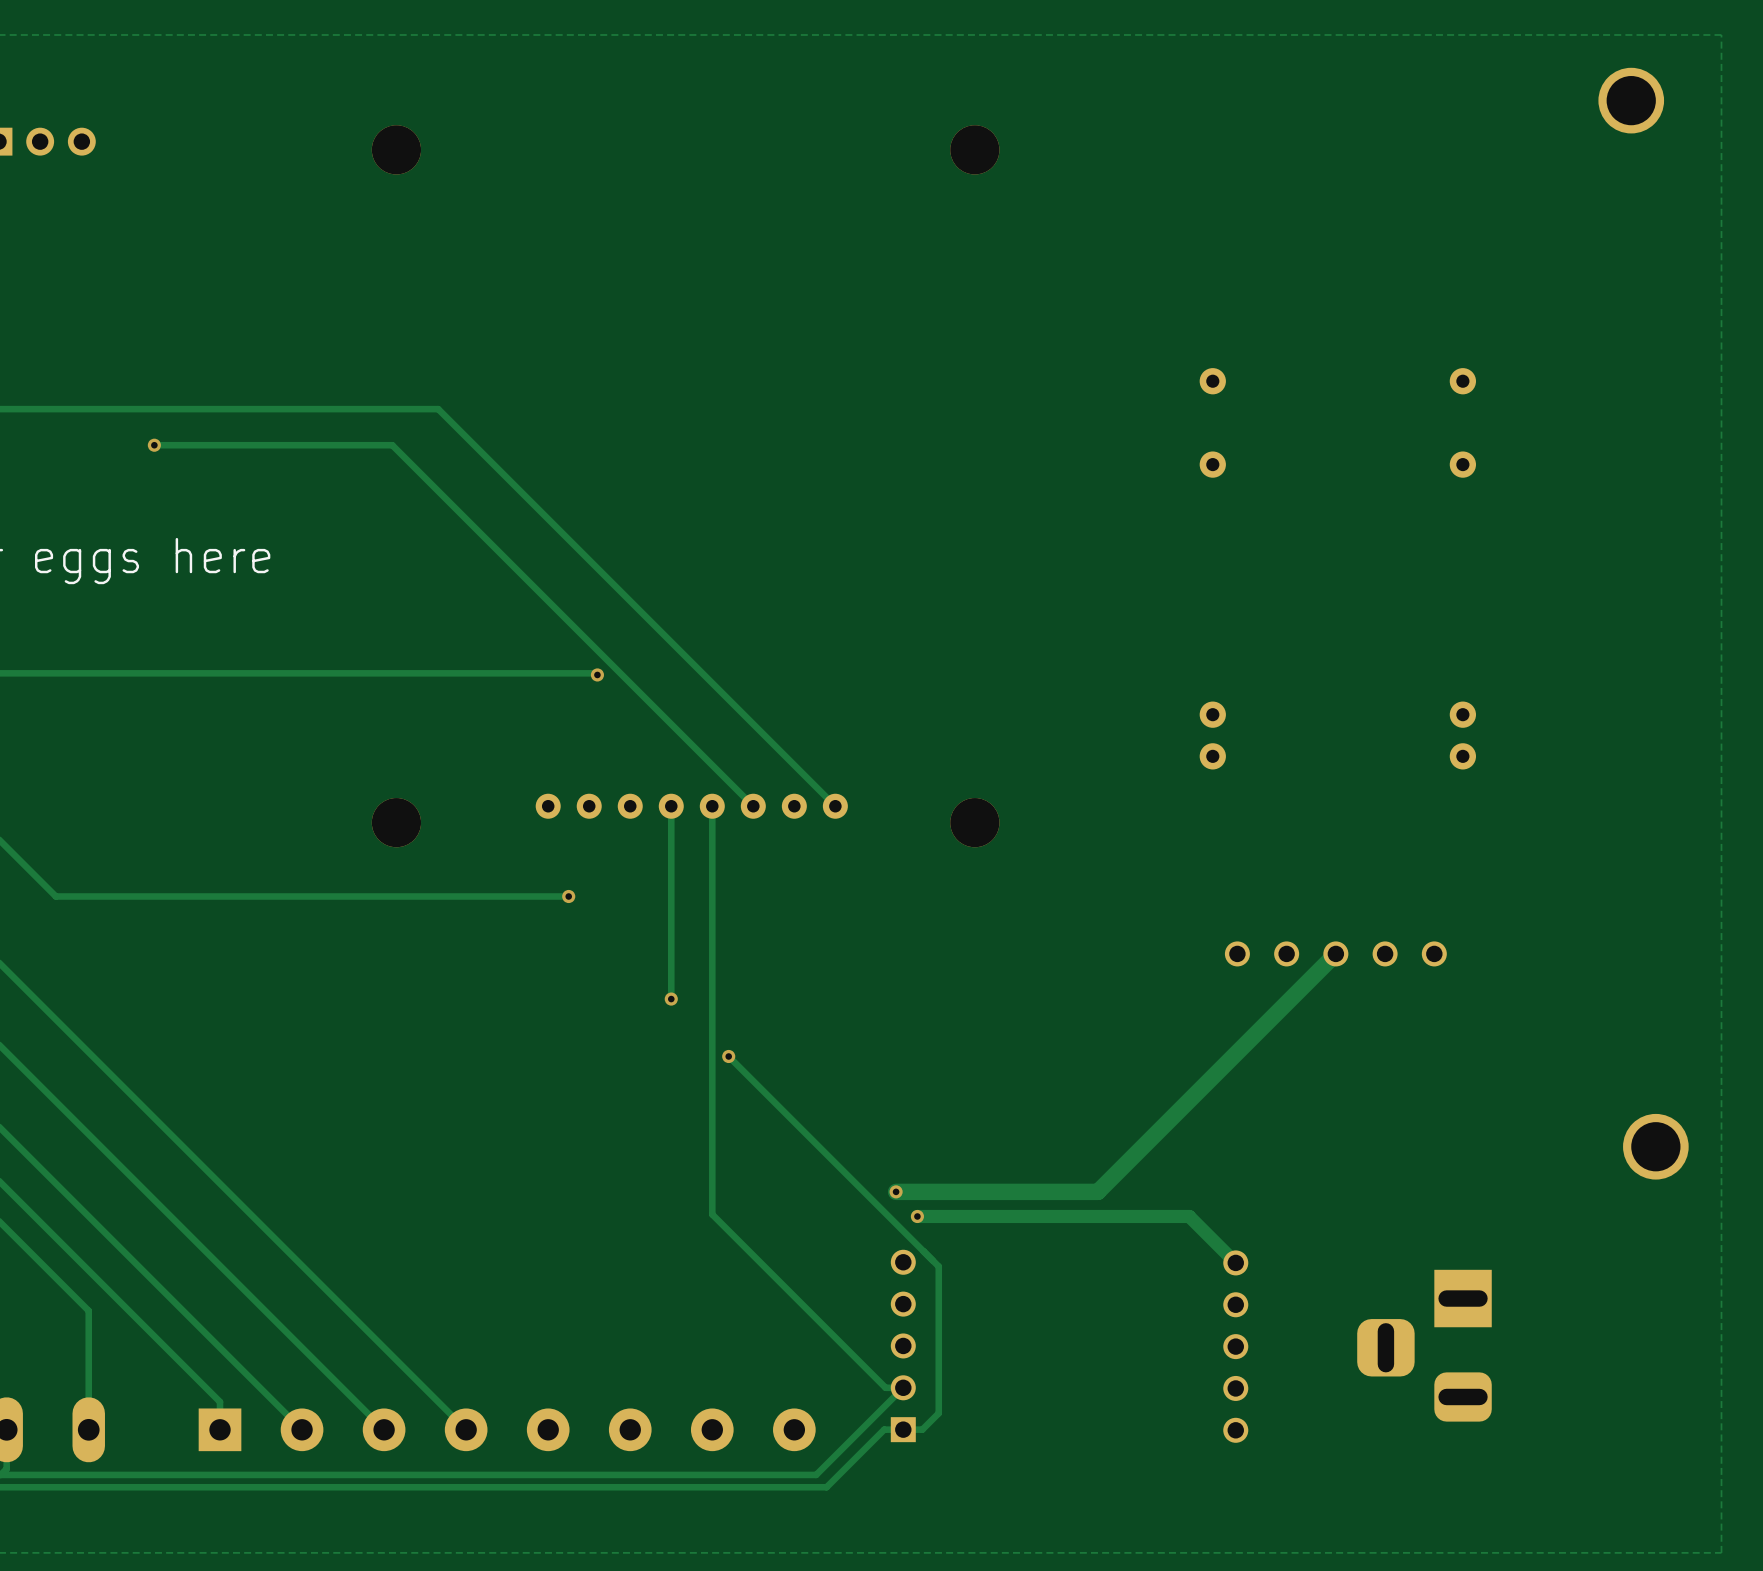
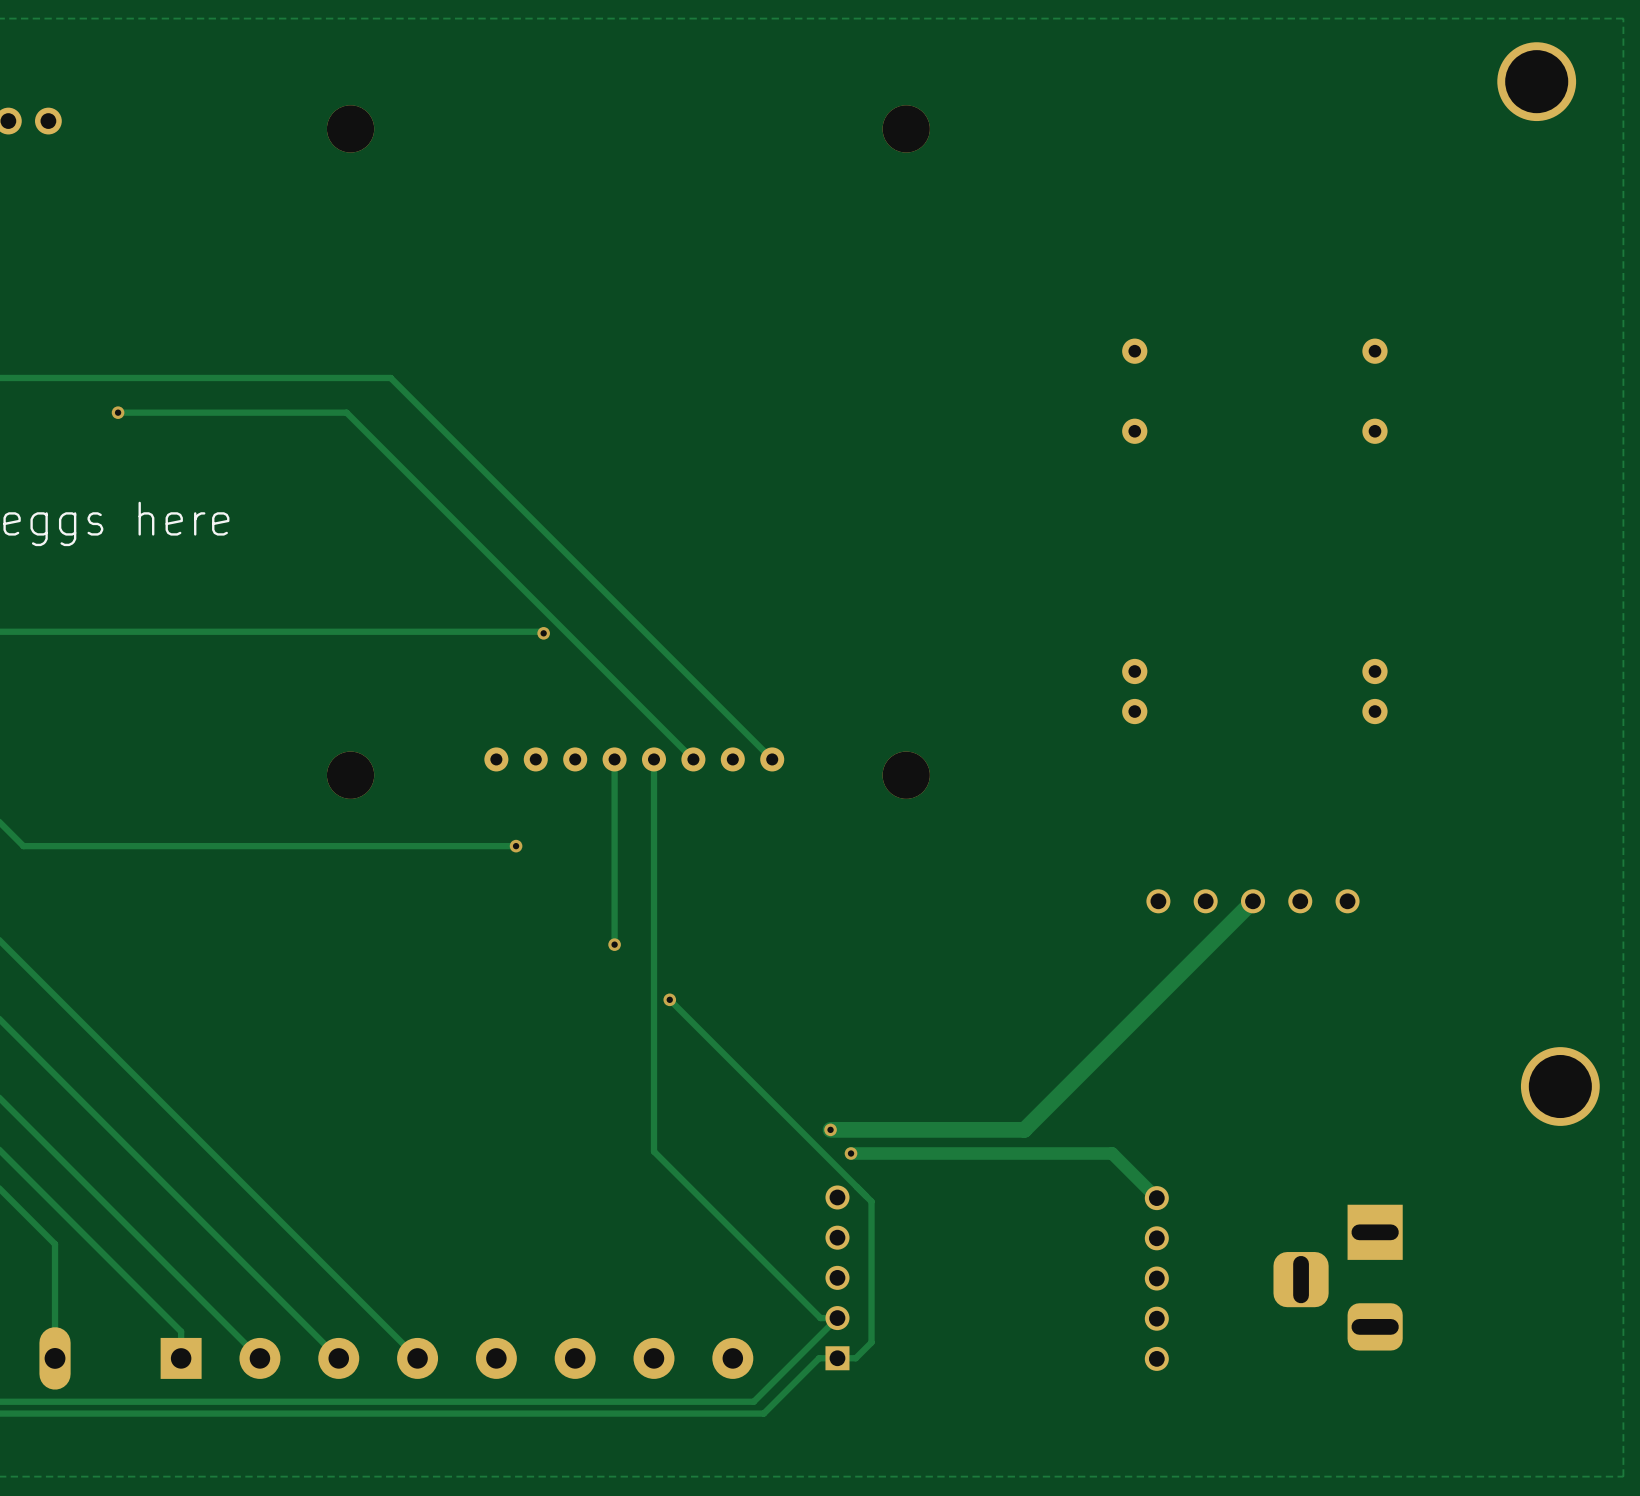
part footprint: [1598, 67, 1665, 134] -> [1497, 42, 1577, 122]
part footprint: [1623, 1113, 1689, 1180] -> [1520, 1047, 1600, 1126]

